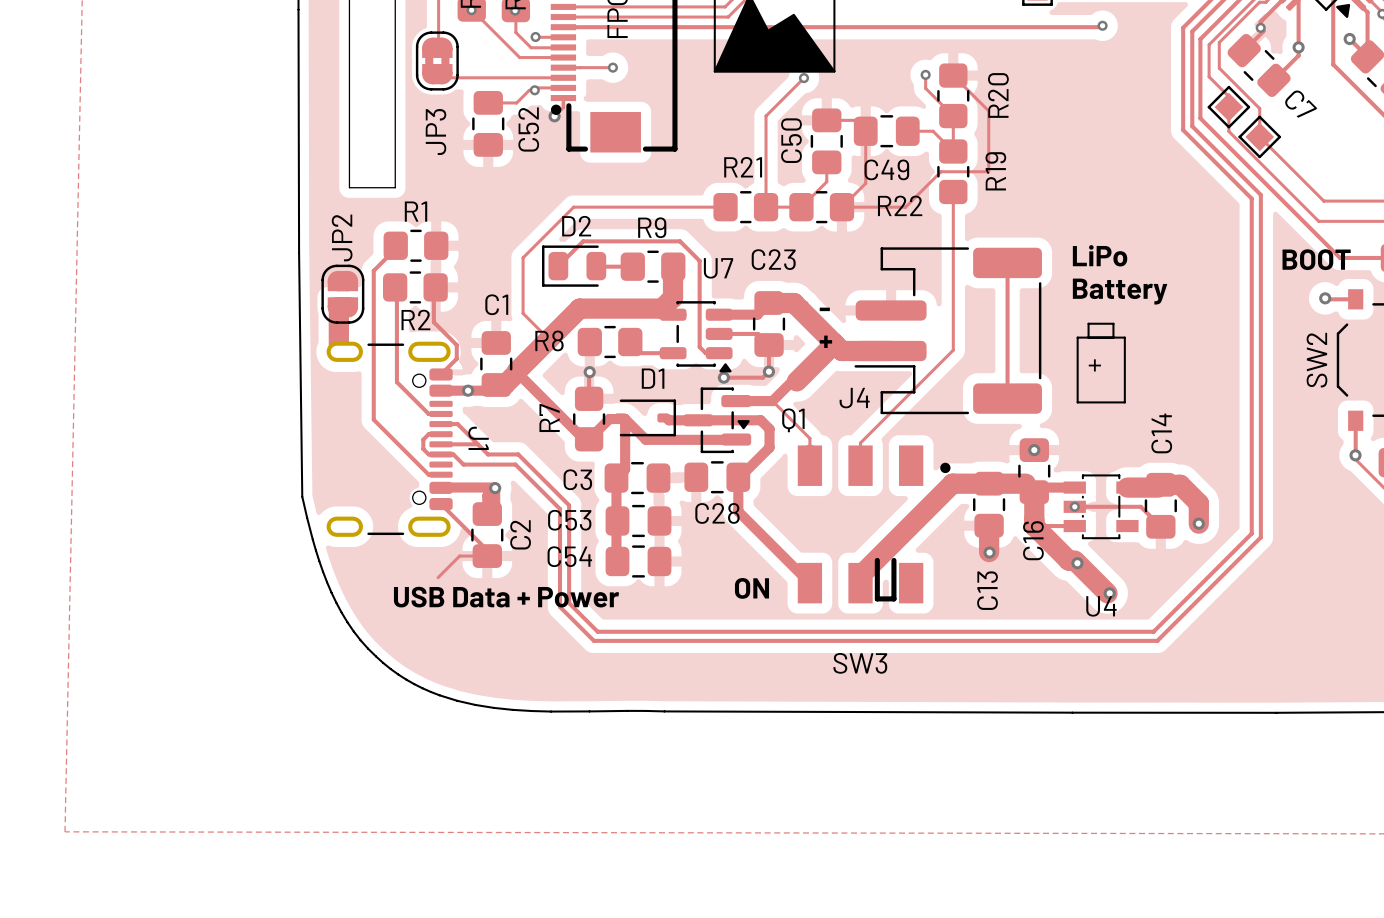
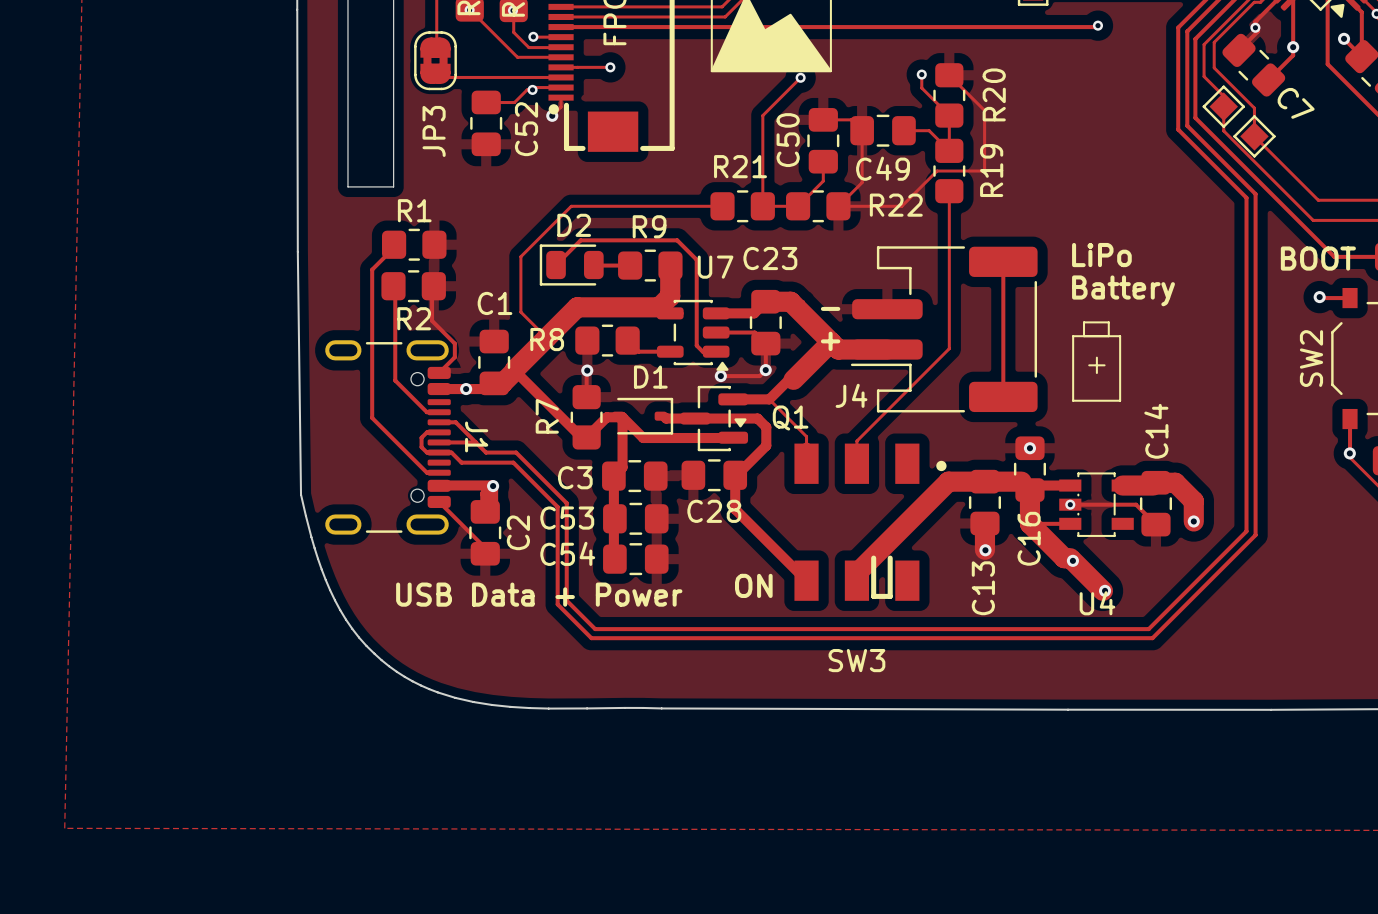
JP2: (342, 294) -> none
track: (338, 307) (338, 345) (344, 351) -> none
track: (487, 556) (459, 556) (438, 577) -> none

